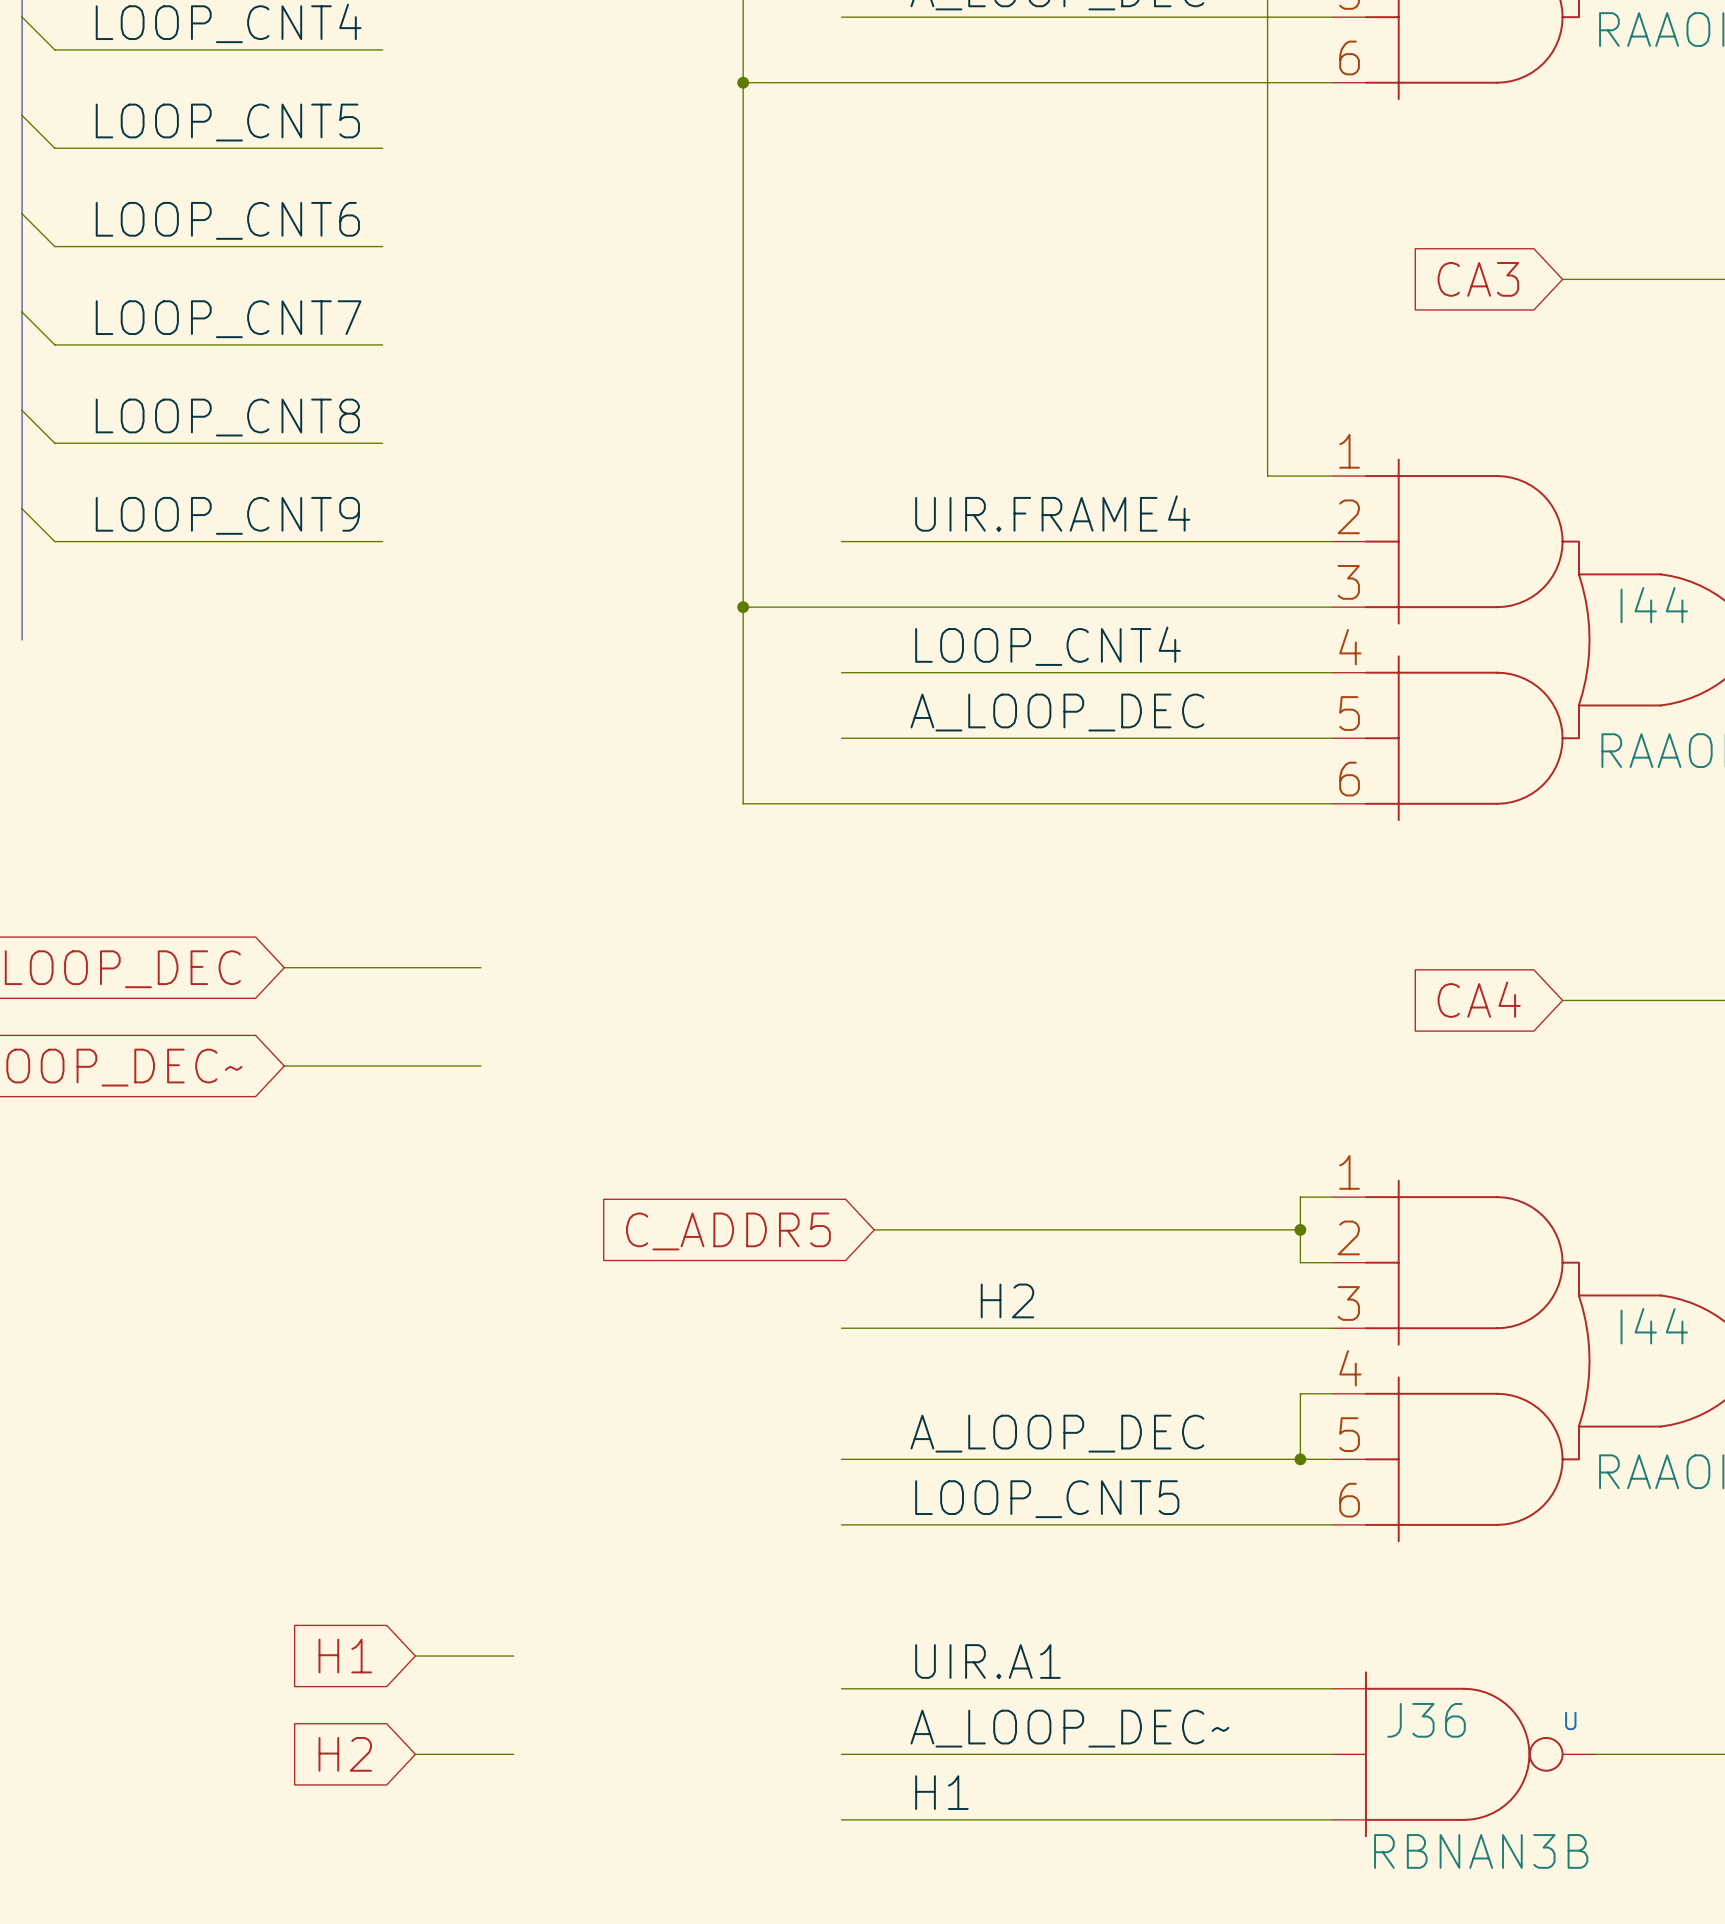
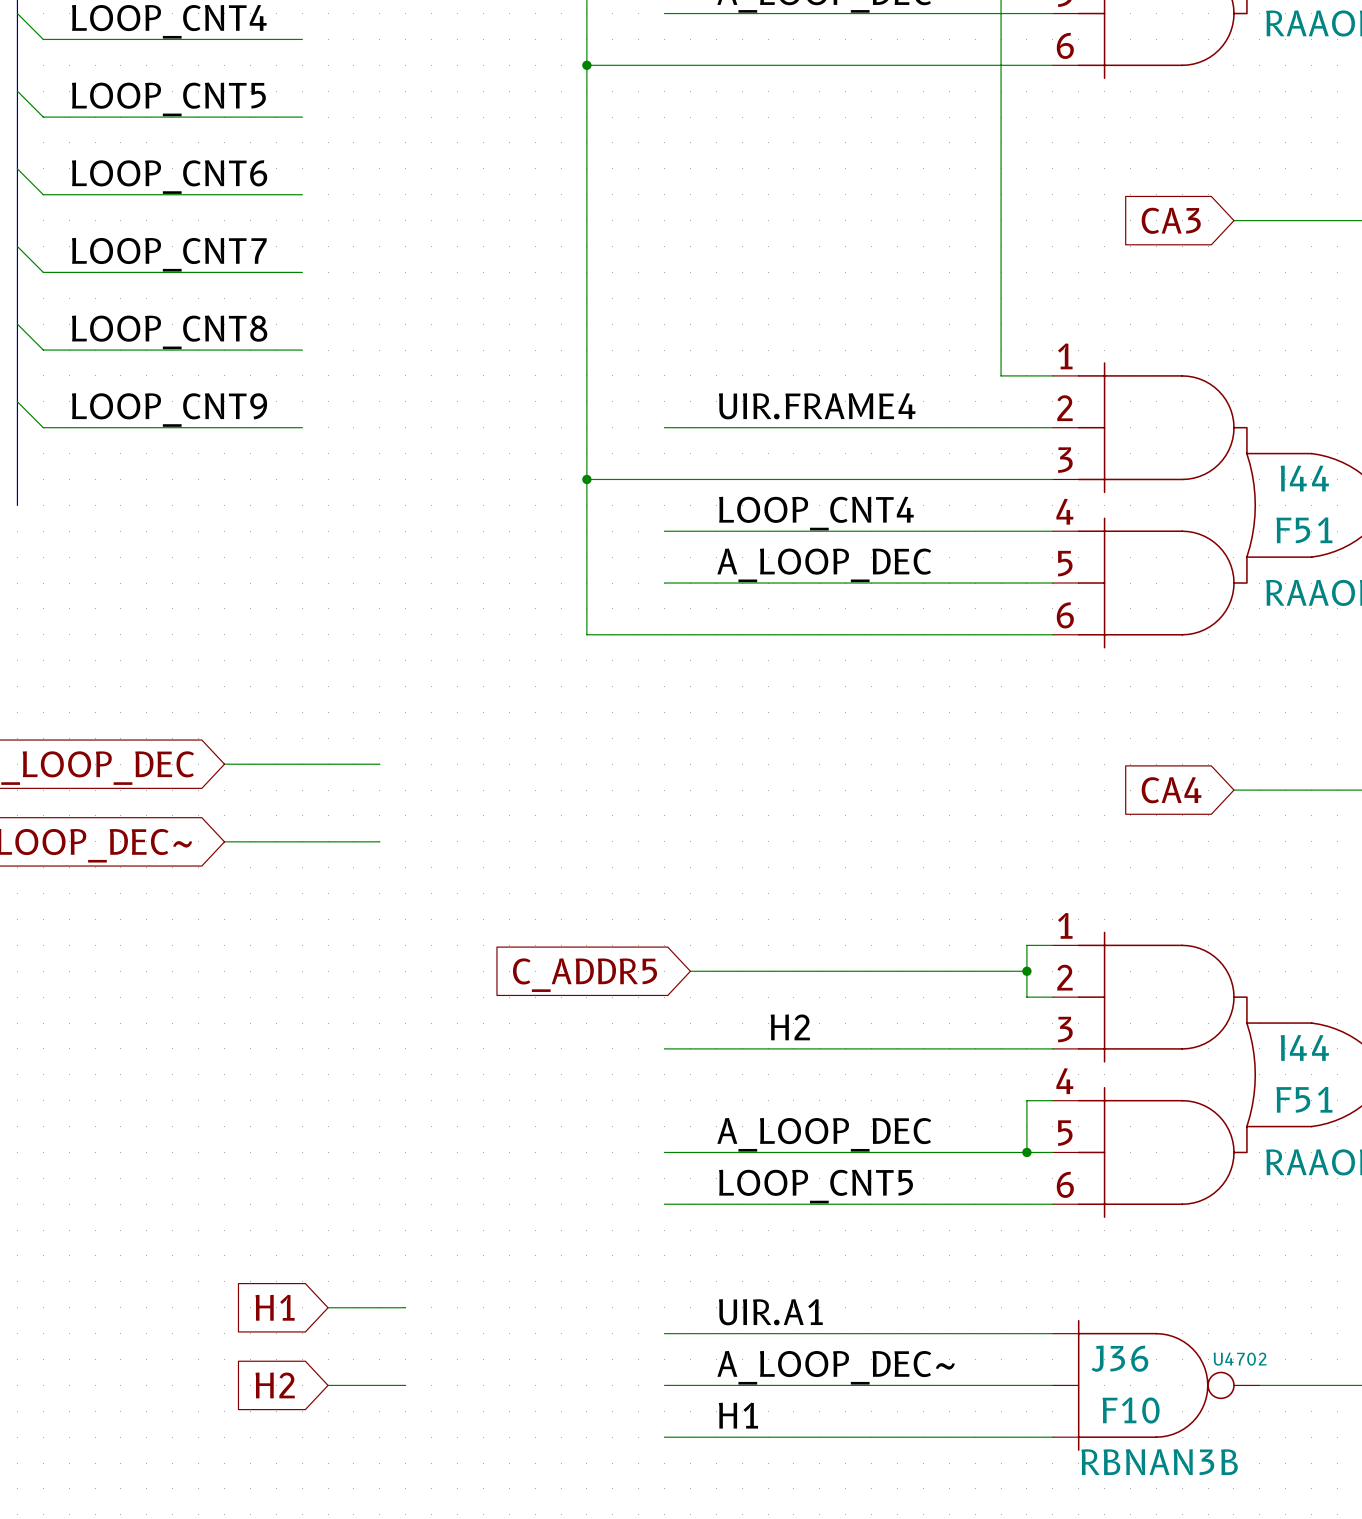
part value: none -> F51 (1304, 530)
part value: none -> F51 (1304, 1099)
U name: U (1570, 1720) -> U4702 (1240, 1359)
U value: none -> F10 (1131, 1410)

